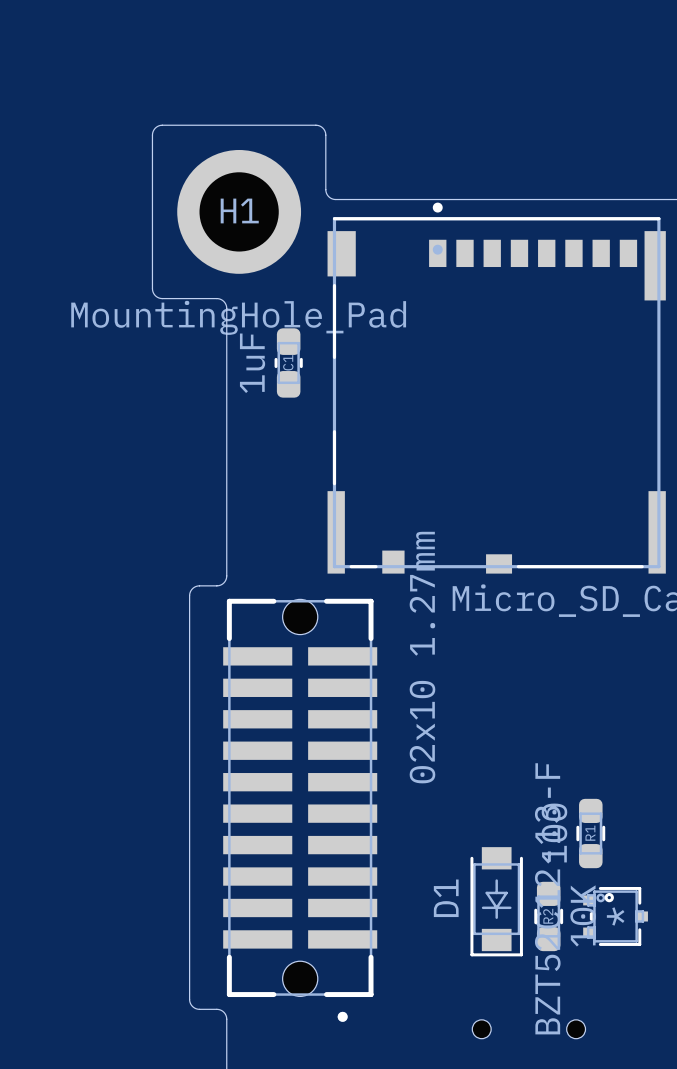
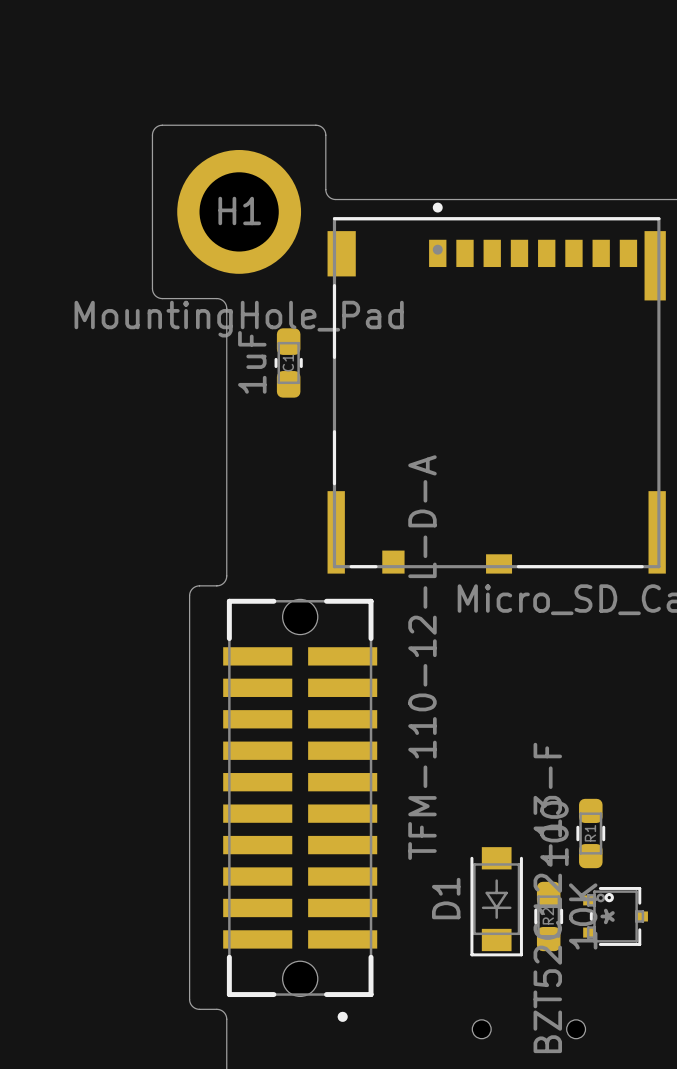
part value: 02x10 1.27mm (422, 657) -> TFM-110-12-L-D-A (422, 657)

